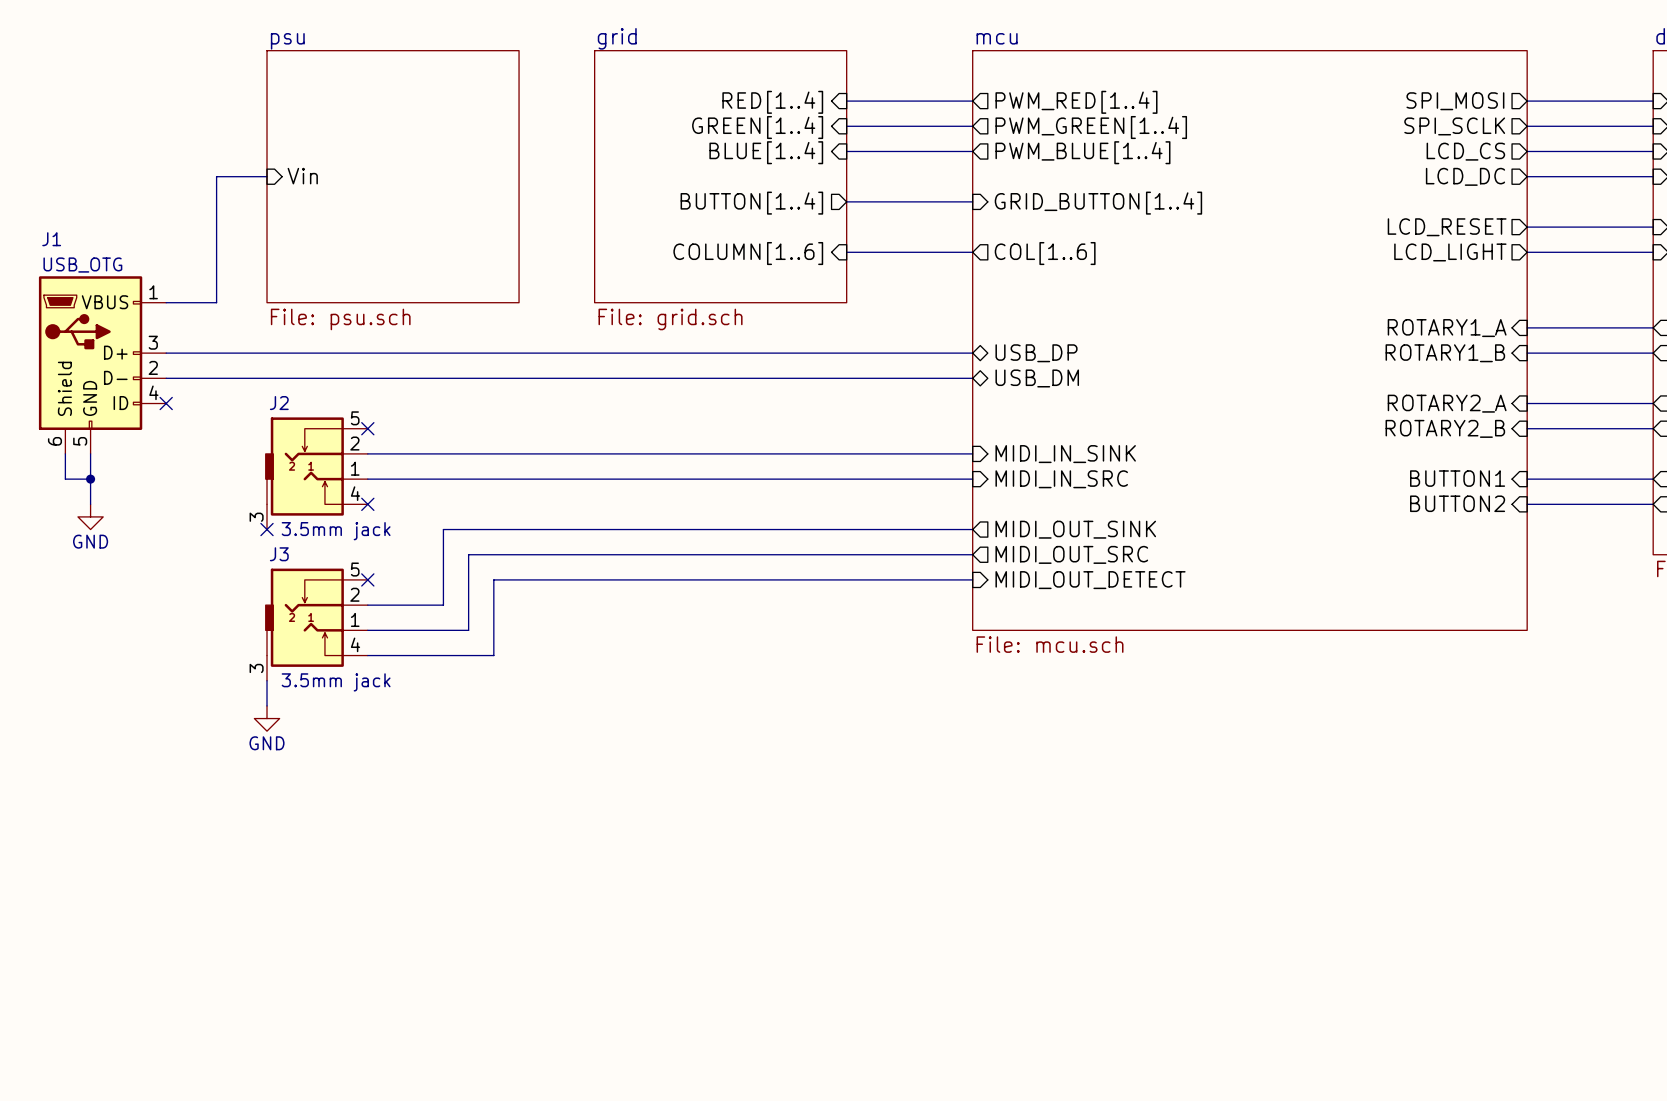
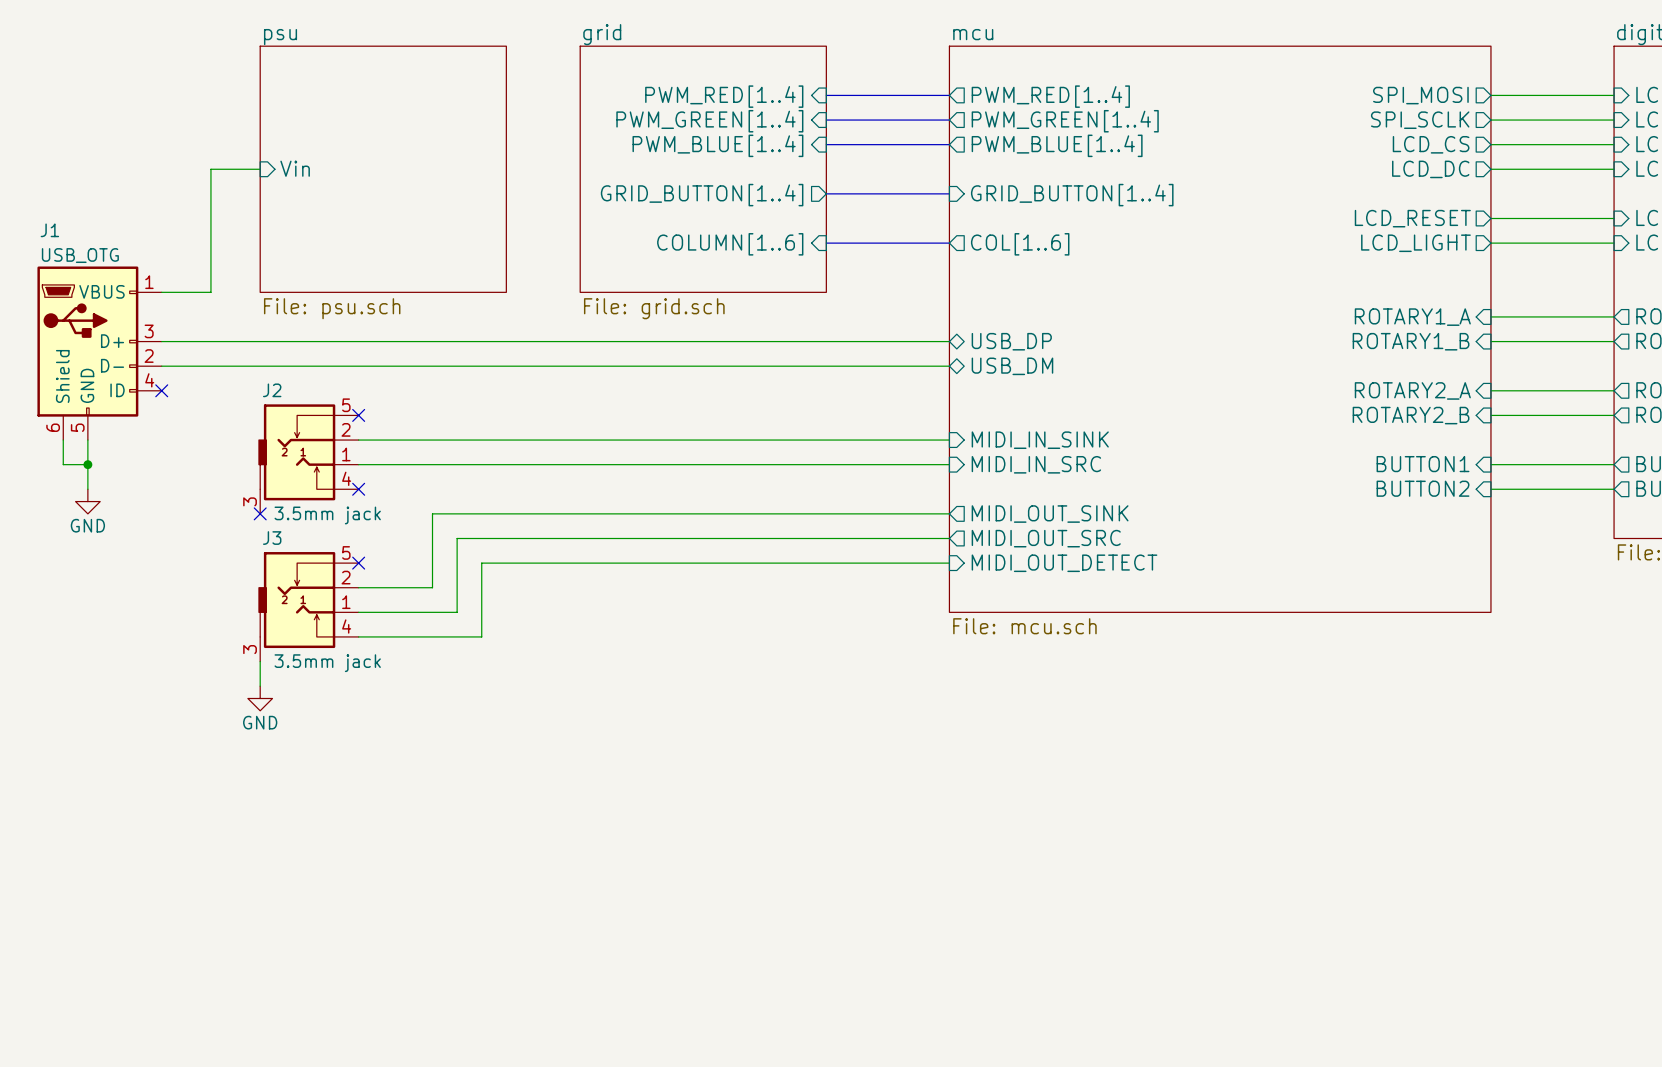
sheet pin: RED[1..4] (772, 102) -> PWM_RED[1..4] (724, 96)
sheet pin: GREEN[1..4] (757, 127) -> PWM_GREEN[1..4] (709, 121)
sheet pin: BLUE[1..4] (766, 152) -> PWM_BLUE[1..4] (717, 145)
sheet pin: BUTTON[1..4] (751, 203) -> GRID_BUTTON[1..4] (702, 195)

